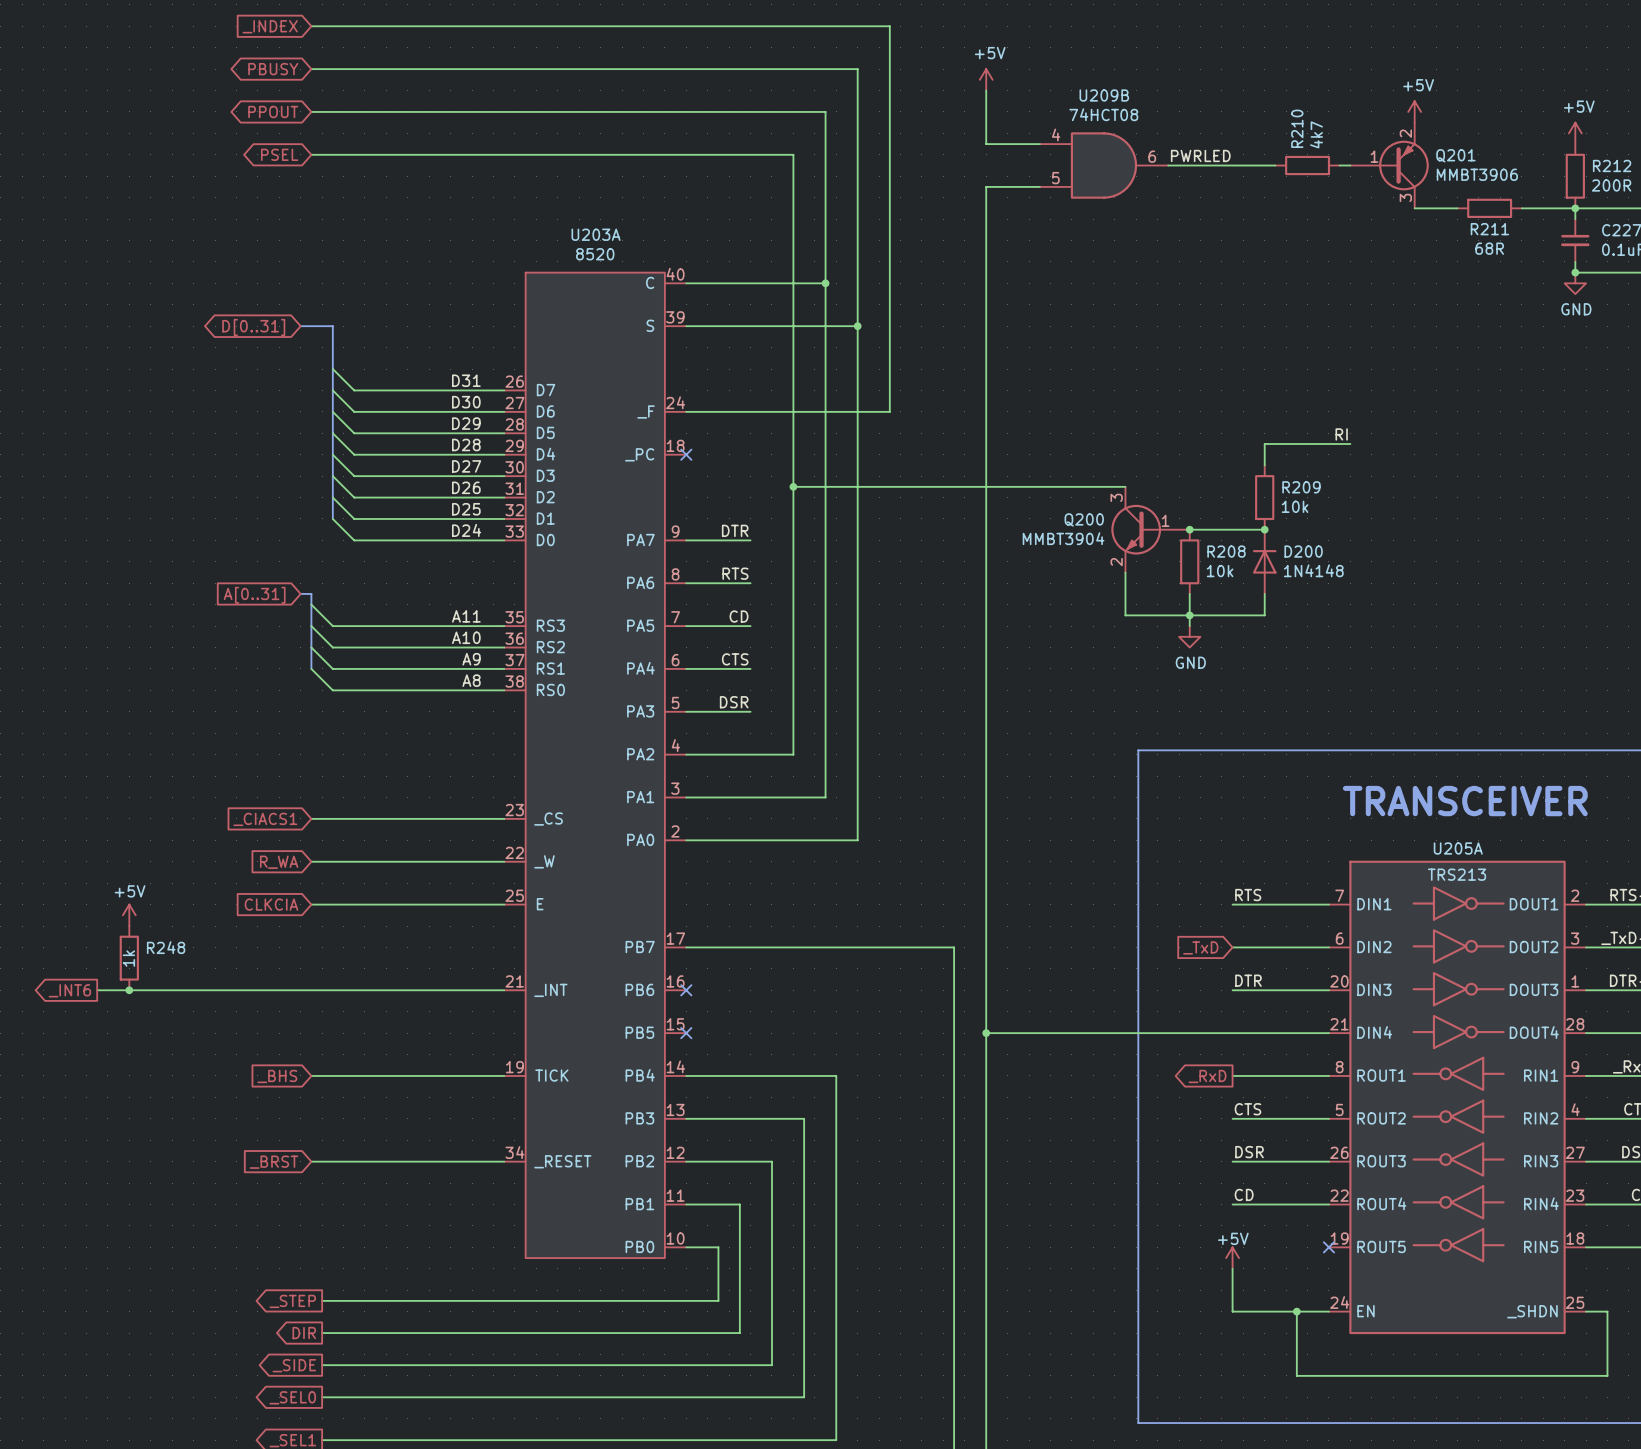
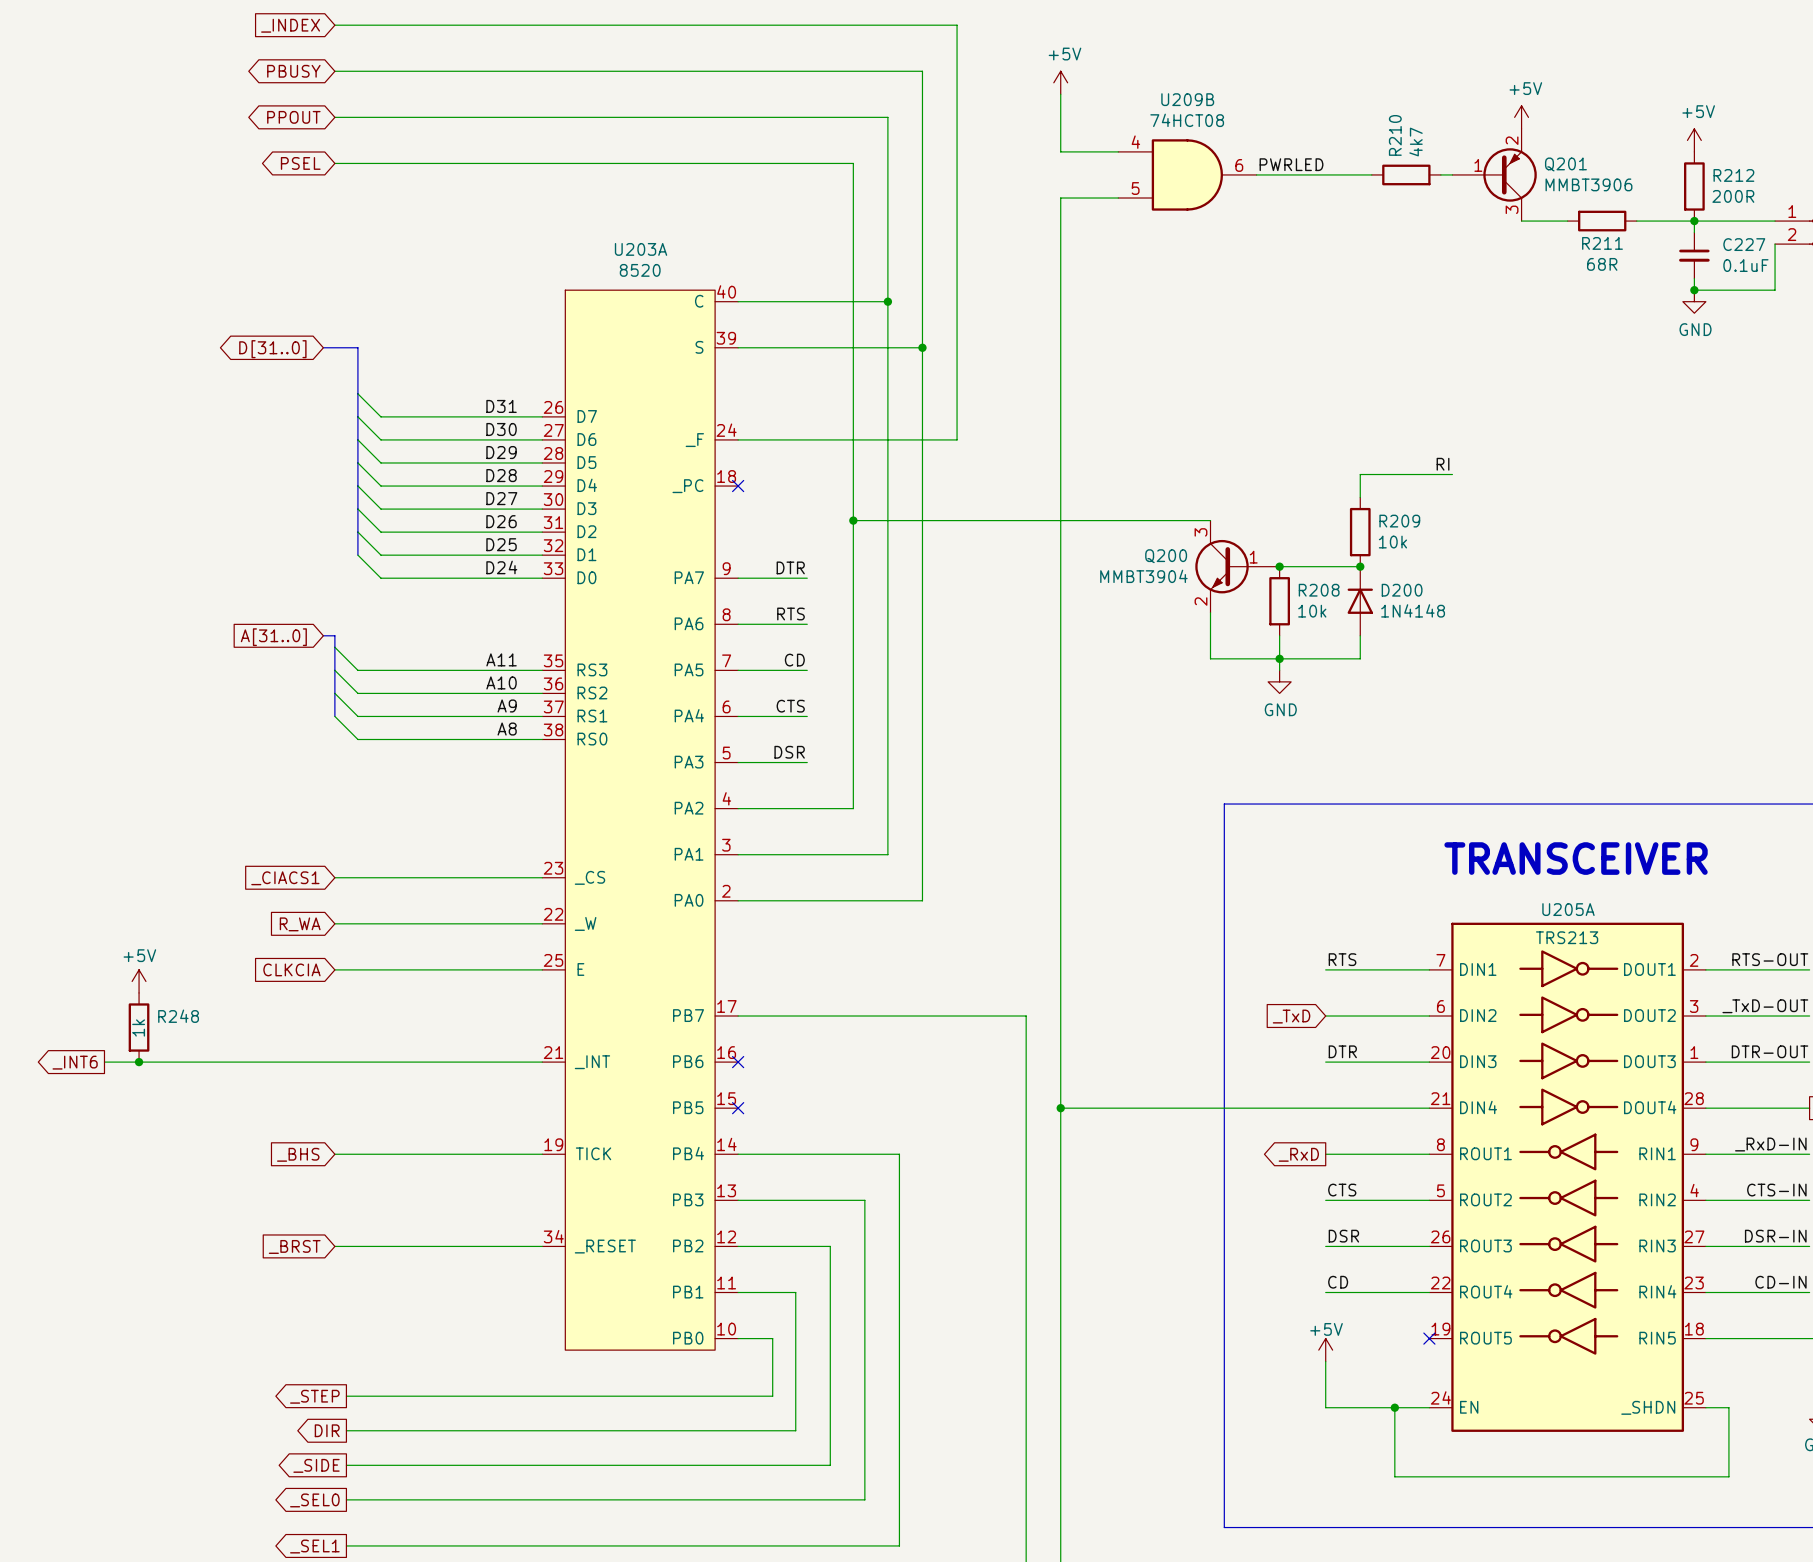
global label: D[0..31] (253, 327) -> D[31..0] (272, 349)
global label: A[0..31] (254, 595) -> A[31..0] (273, 637)

